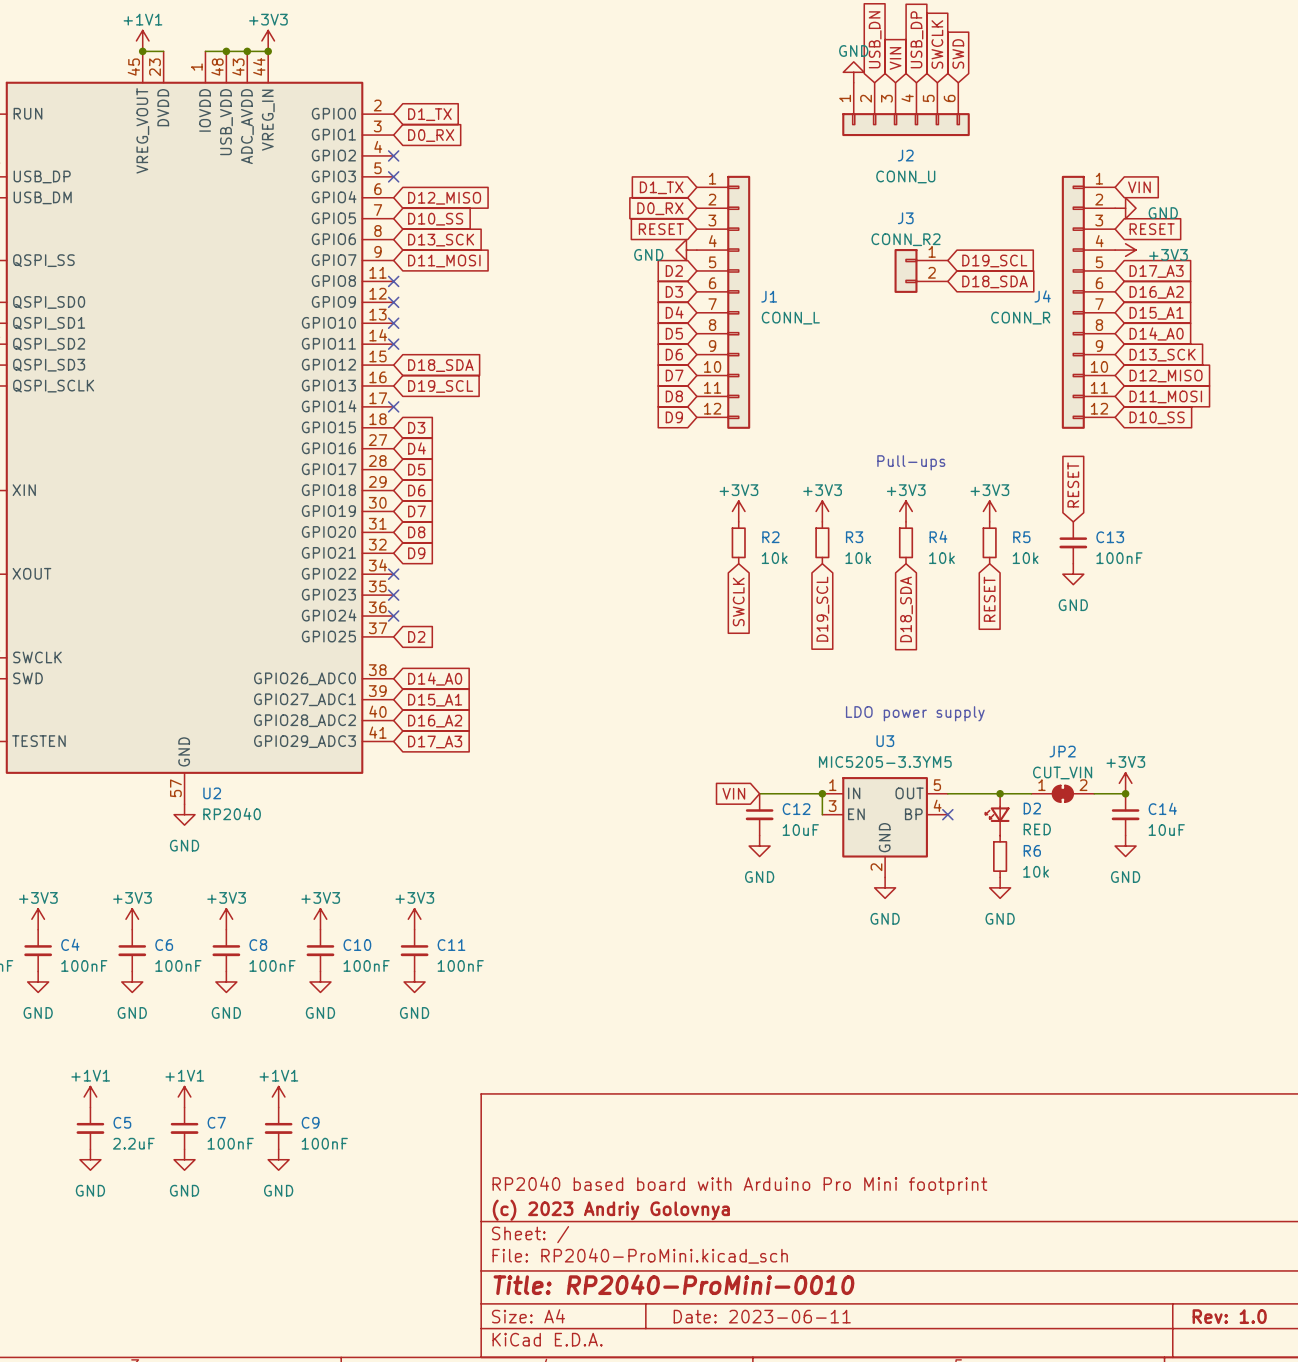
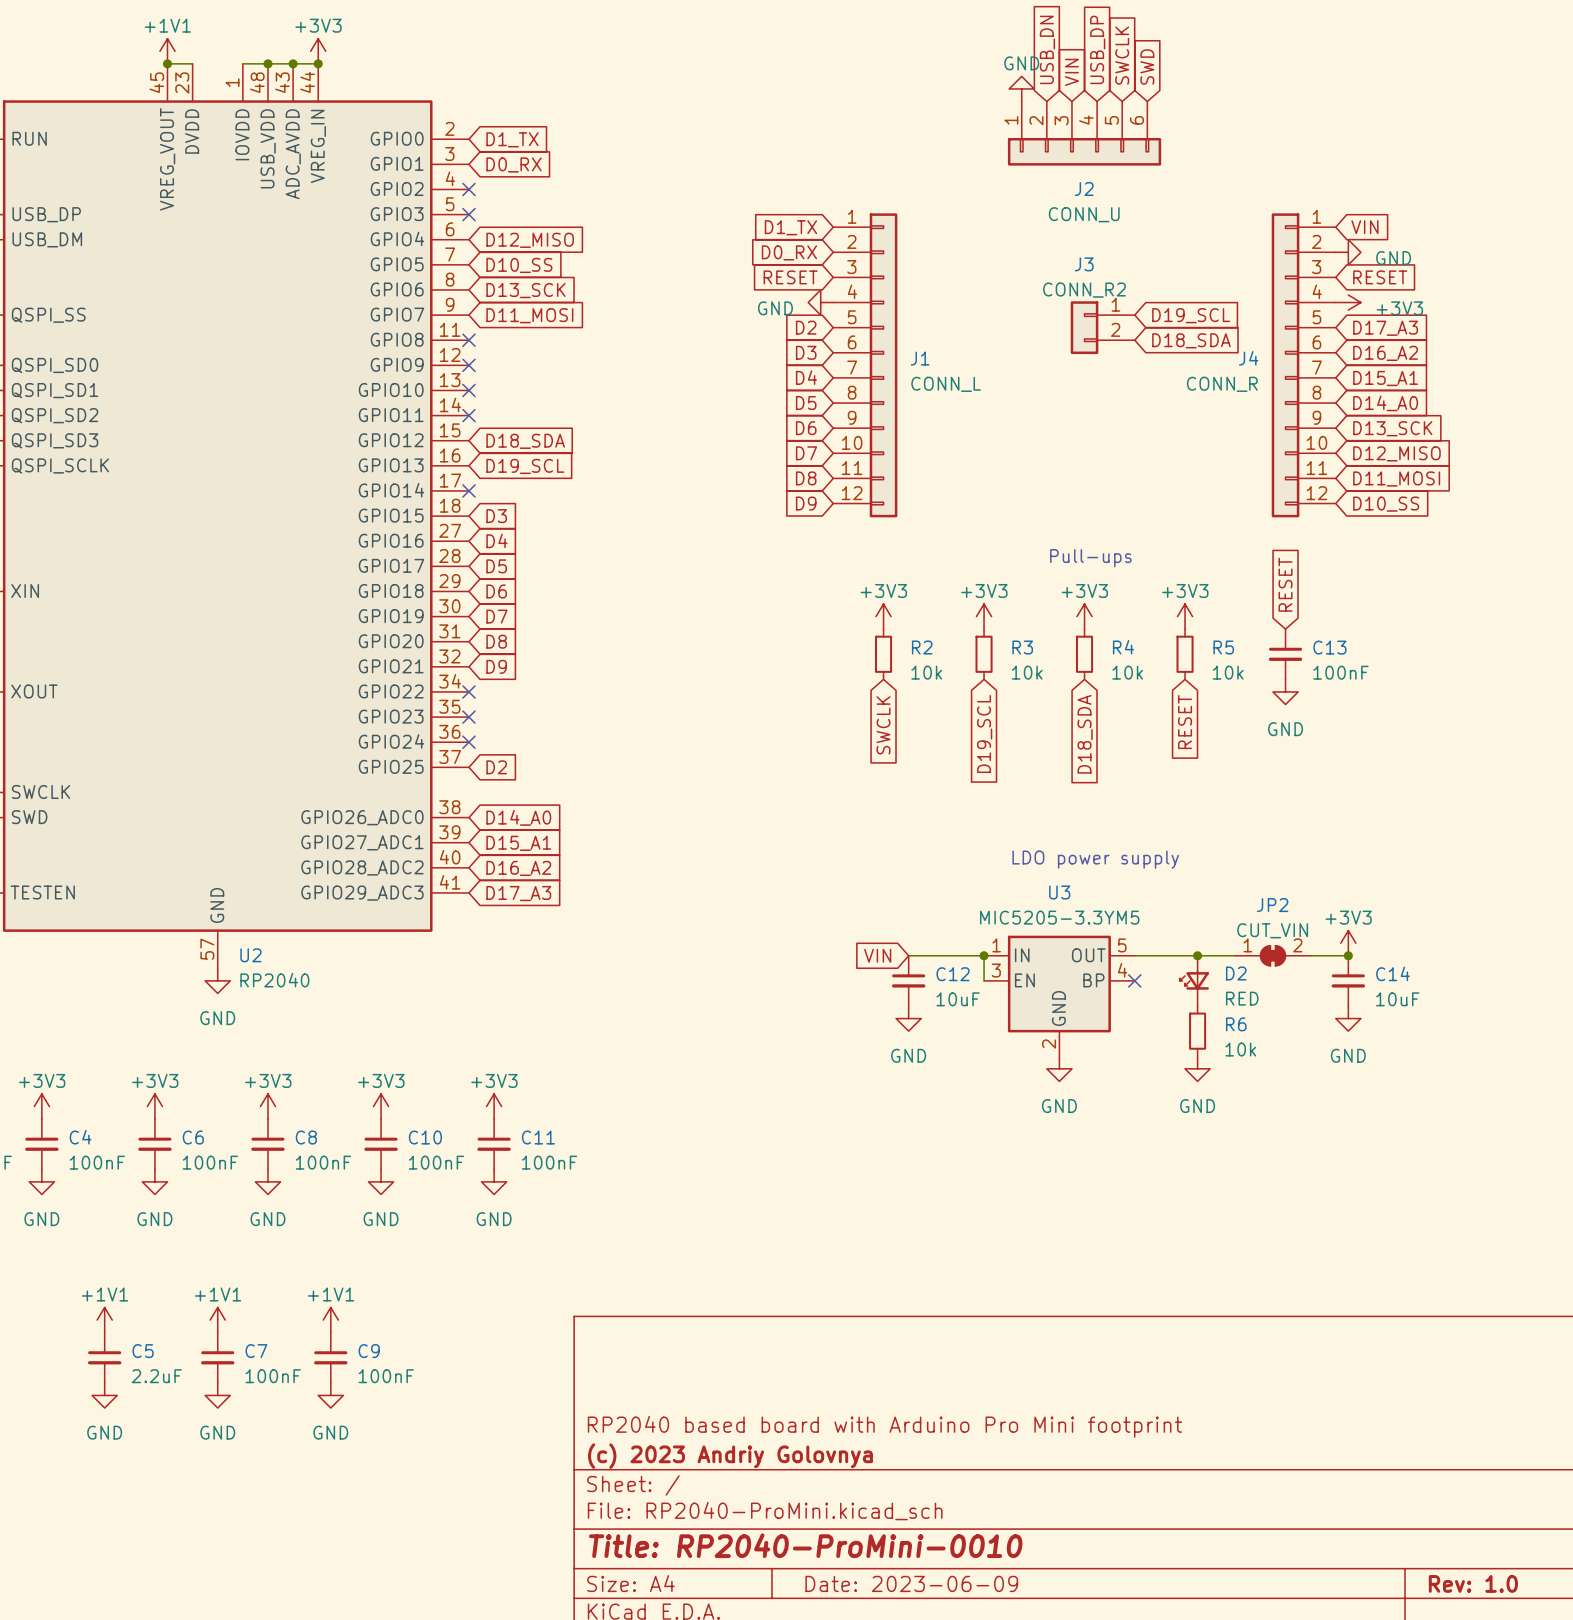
title block: Date: 2023-06-11 (762, 1316) -> Date: 2023-06-09 (911, 1583)

